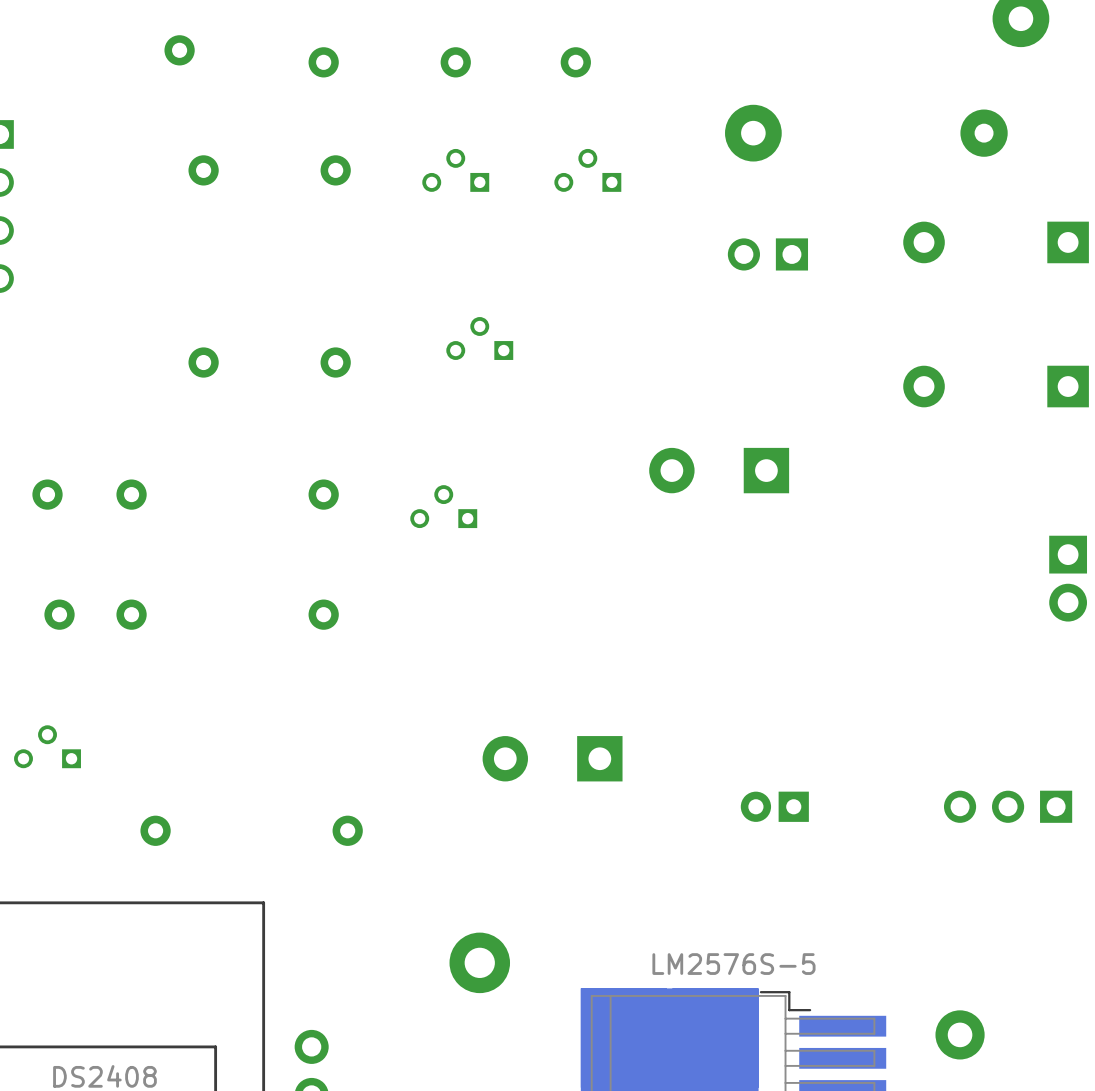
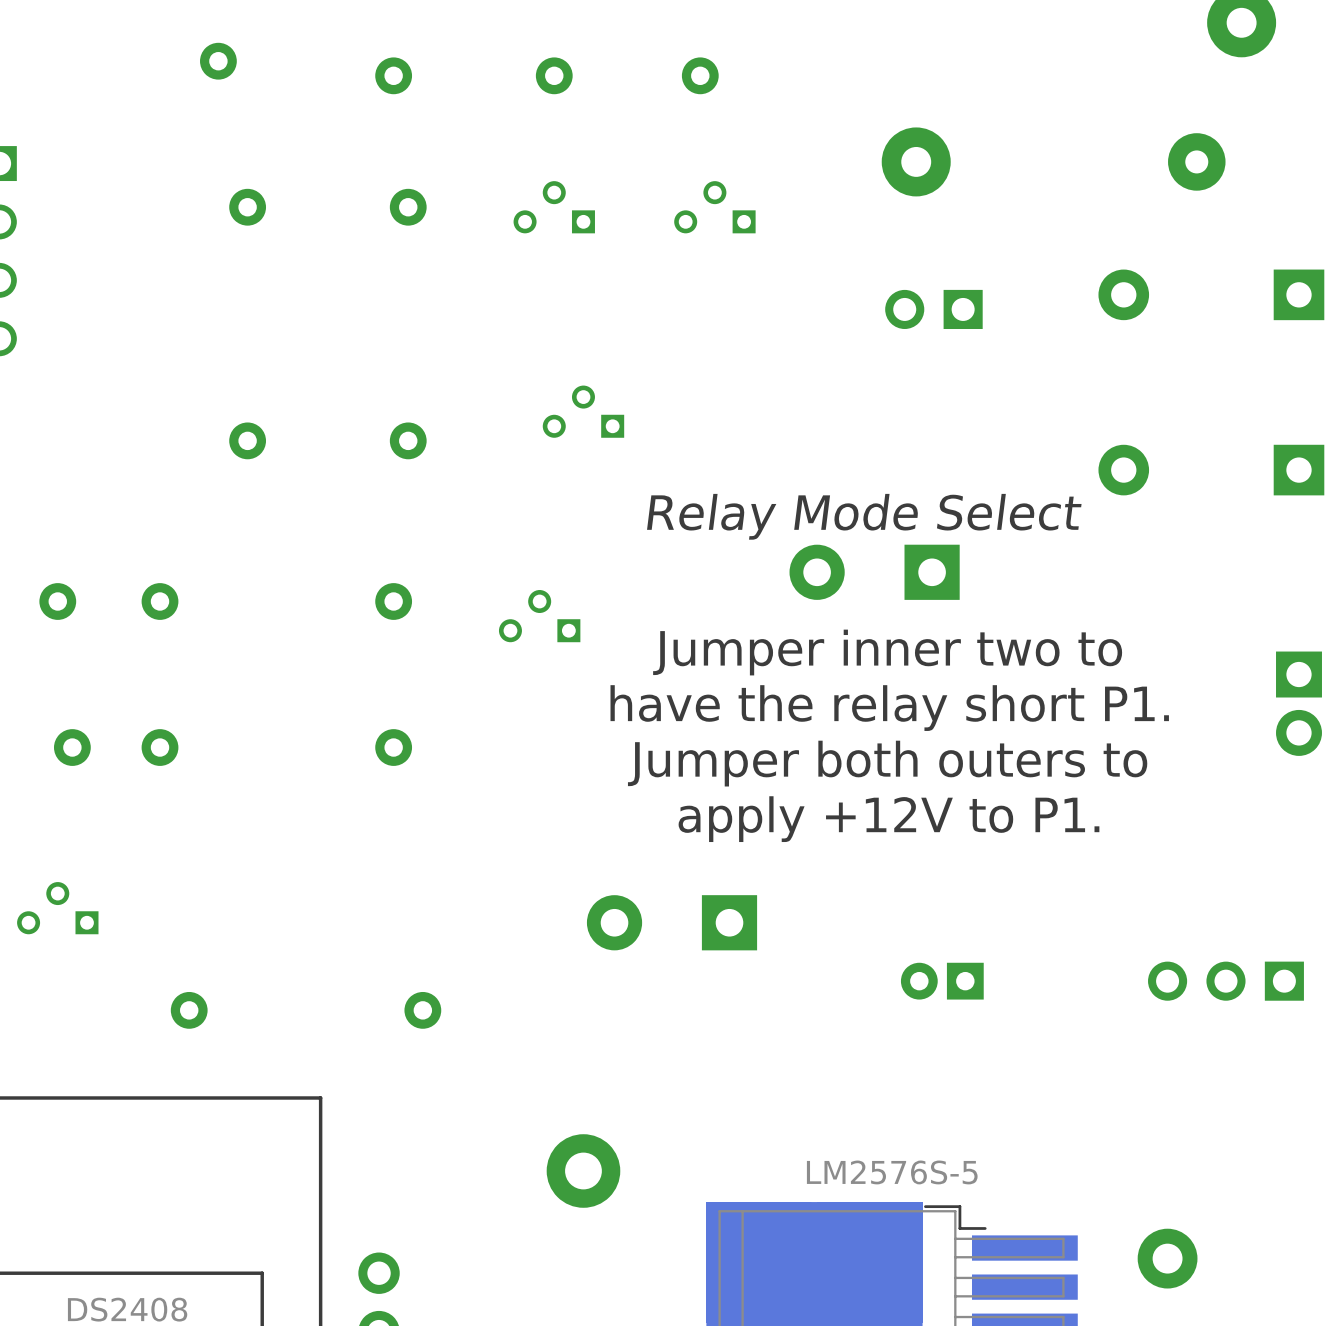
text: none -> Relay Mode Select (864, 516)
text: none -> Jumper inner two to (887, 652)
text: none -> have the relay short P1. (889, 708)
text: none -> Jumper both outers to (887, 763)
text: none -> apply +12V to P1. (888, 819)

